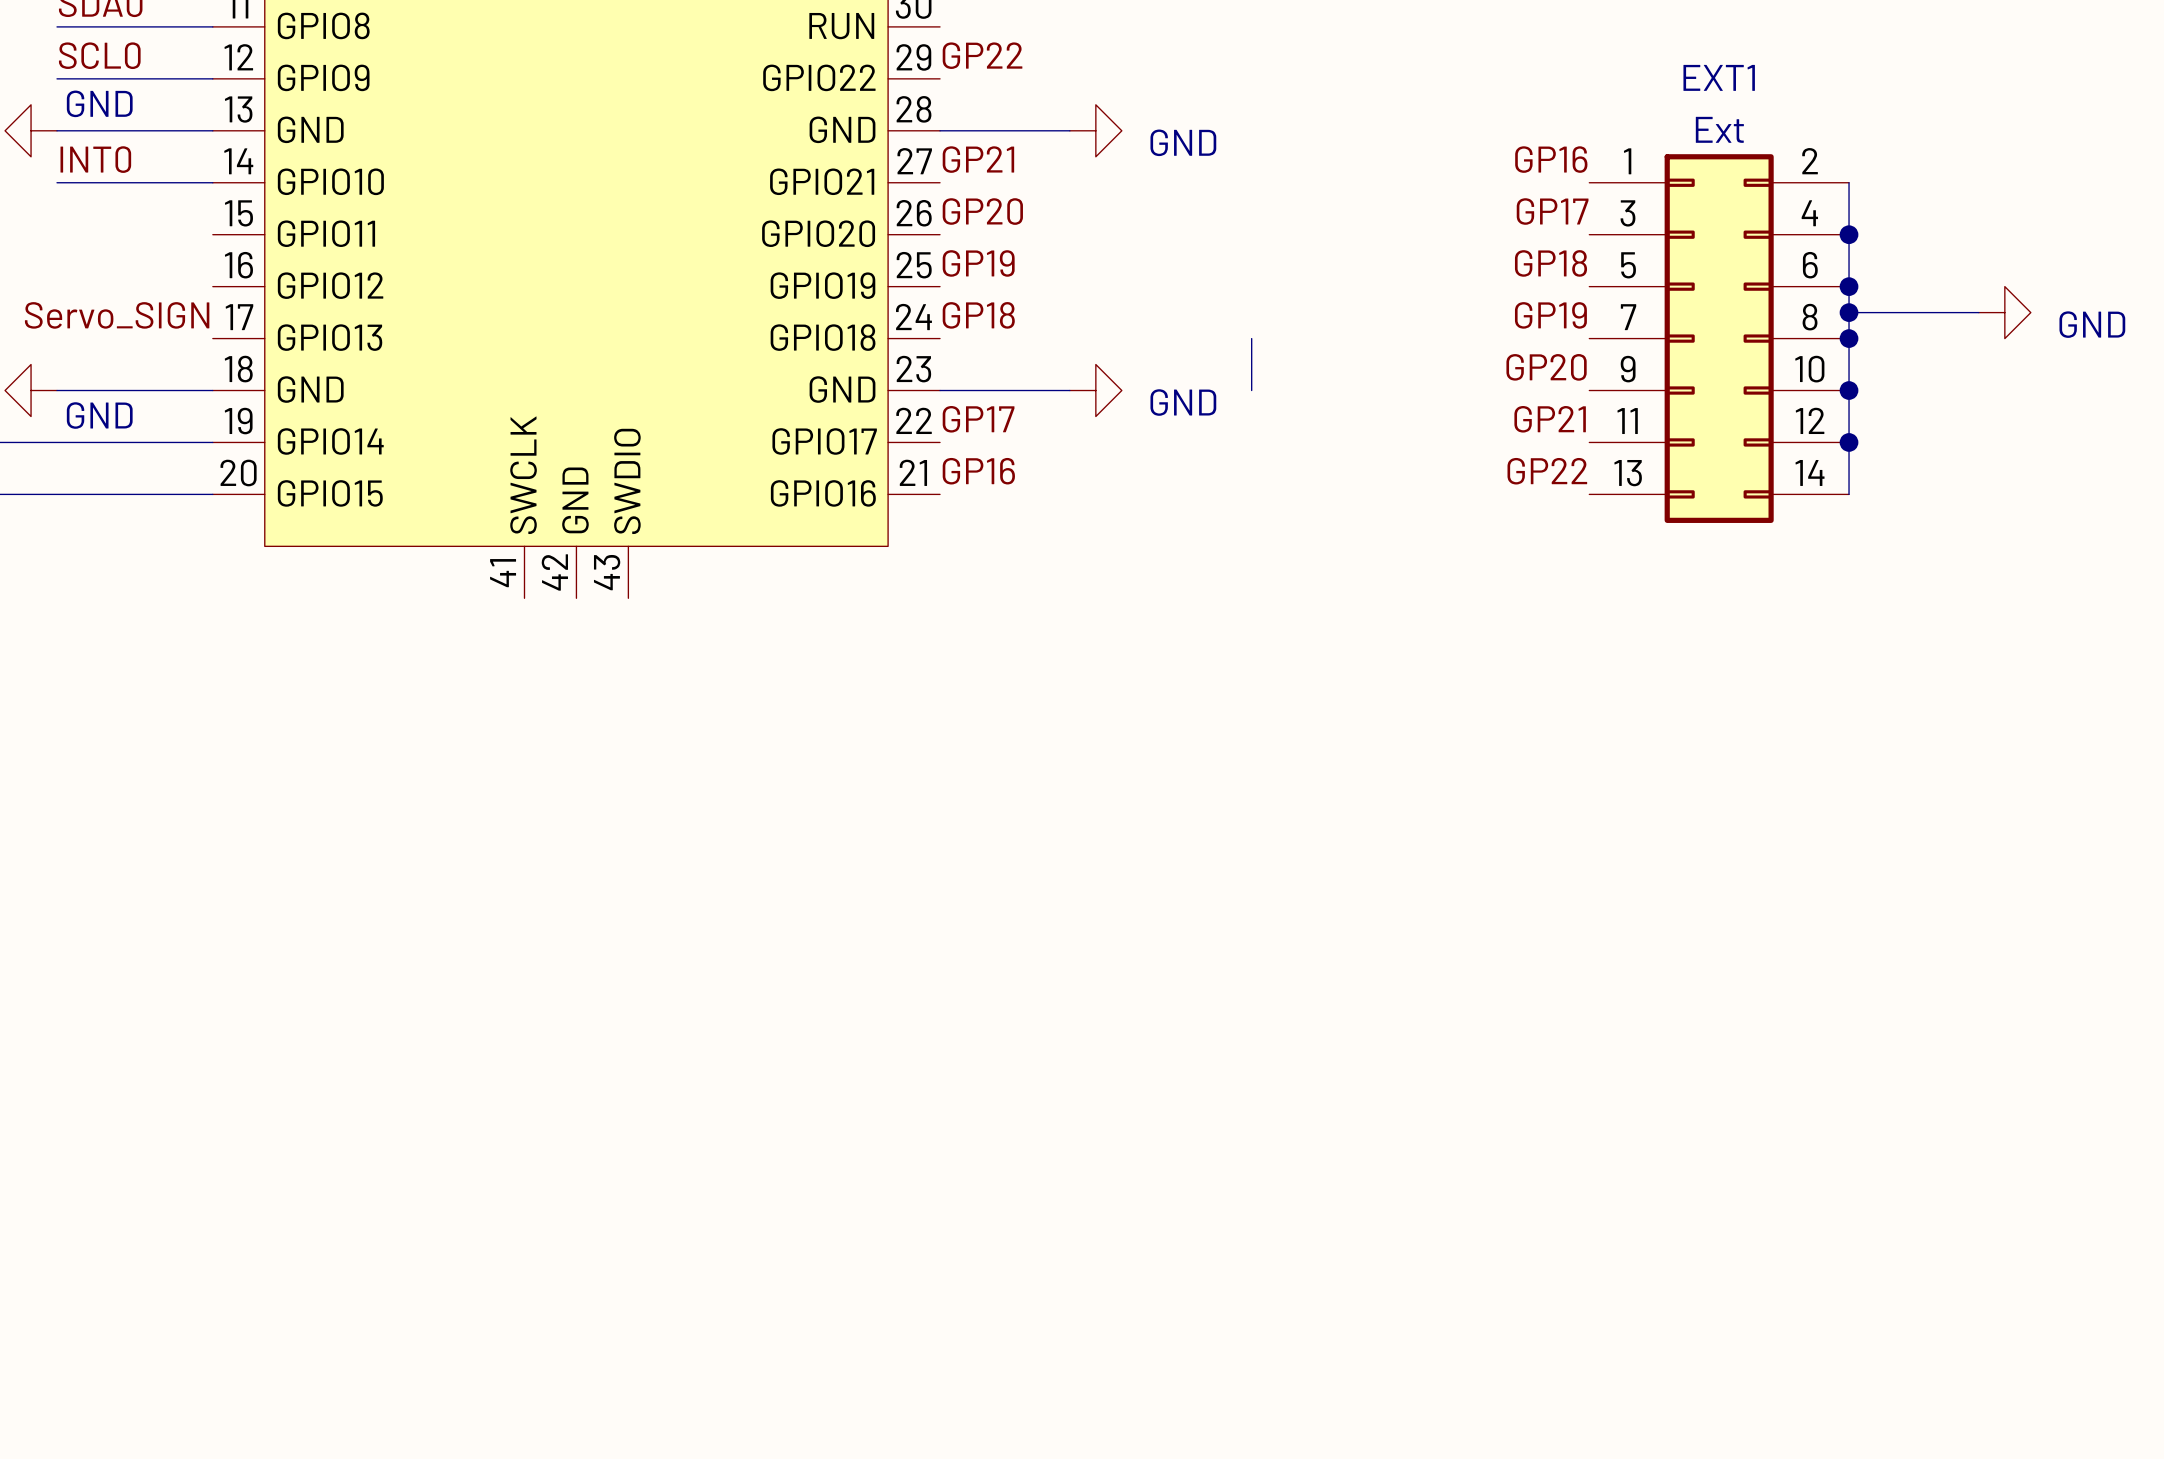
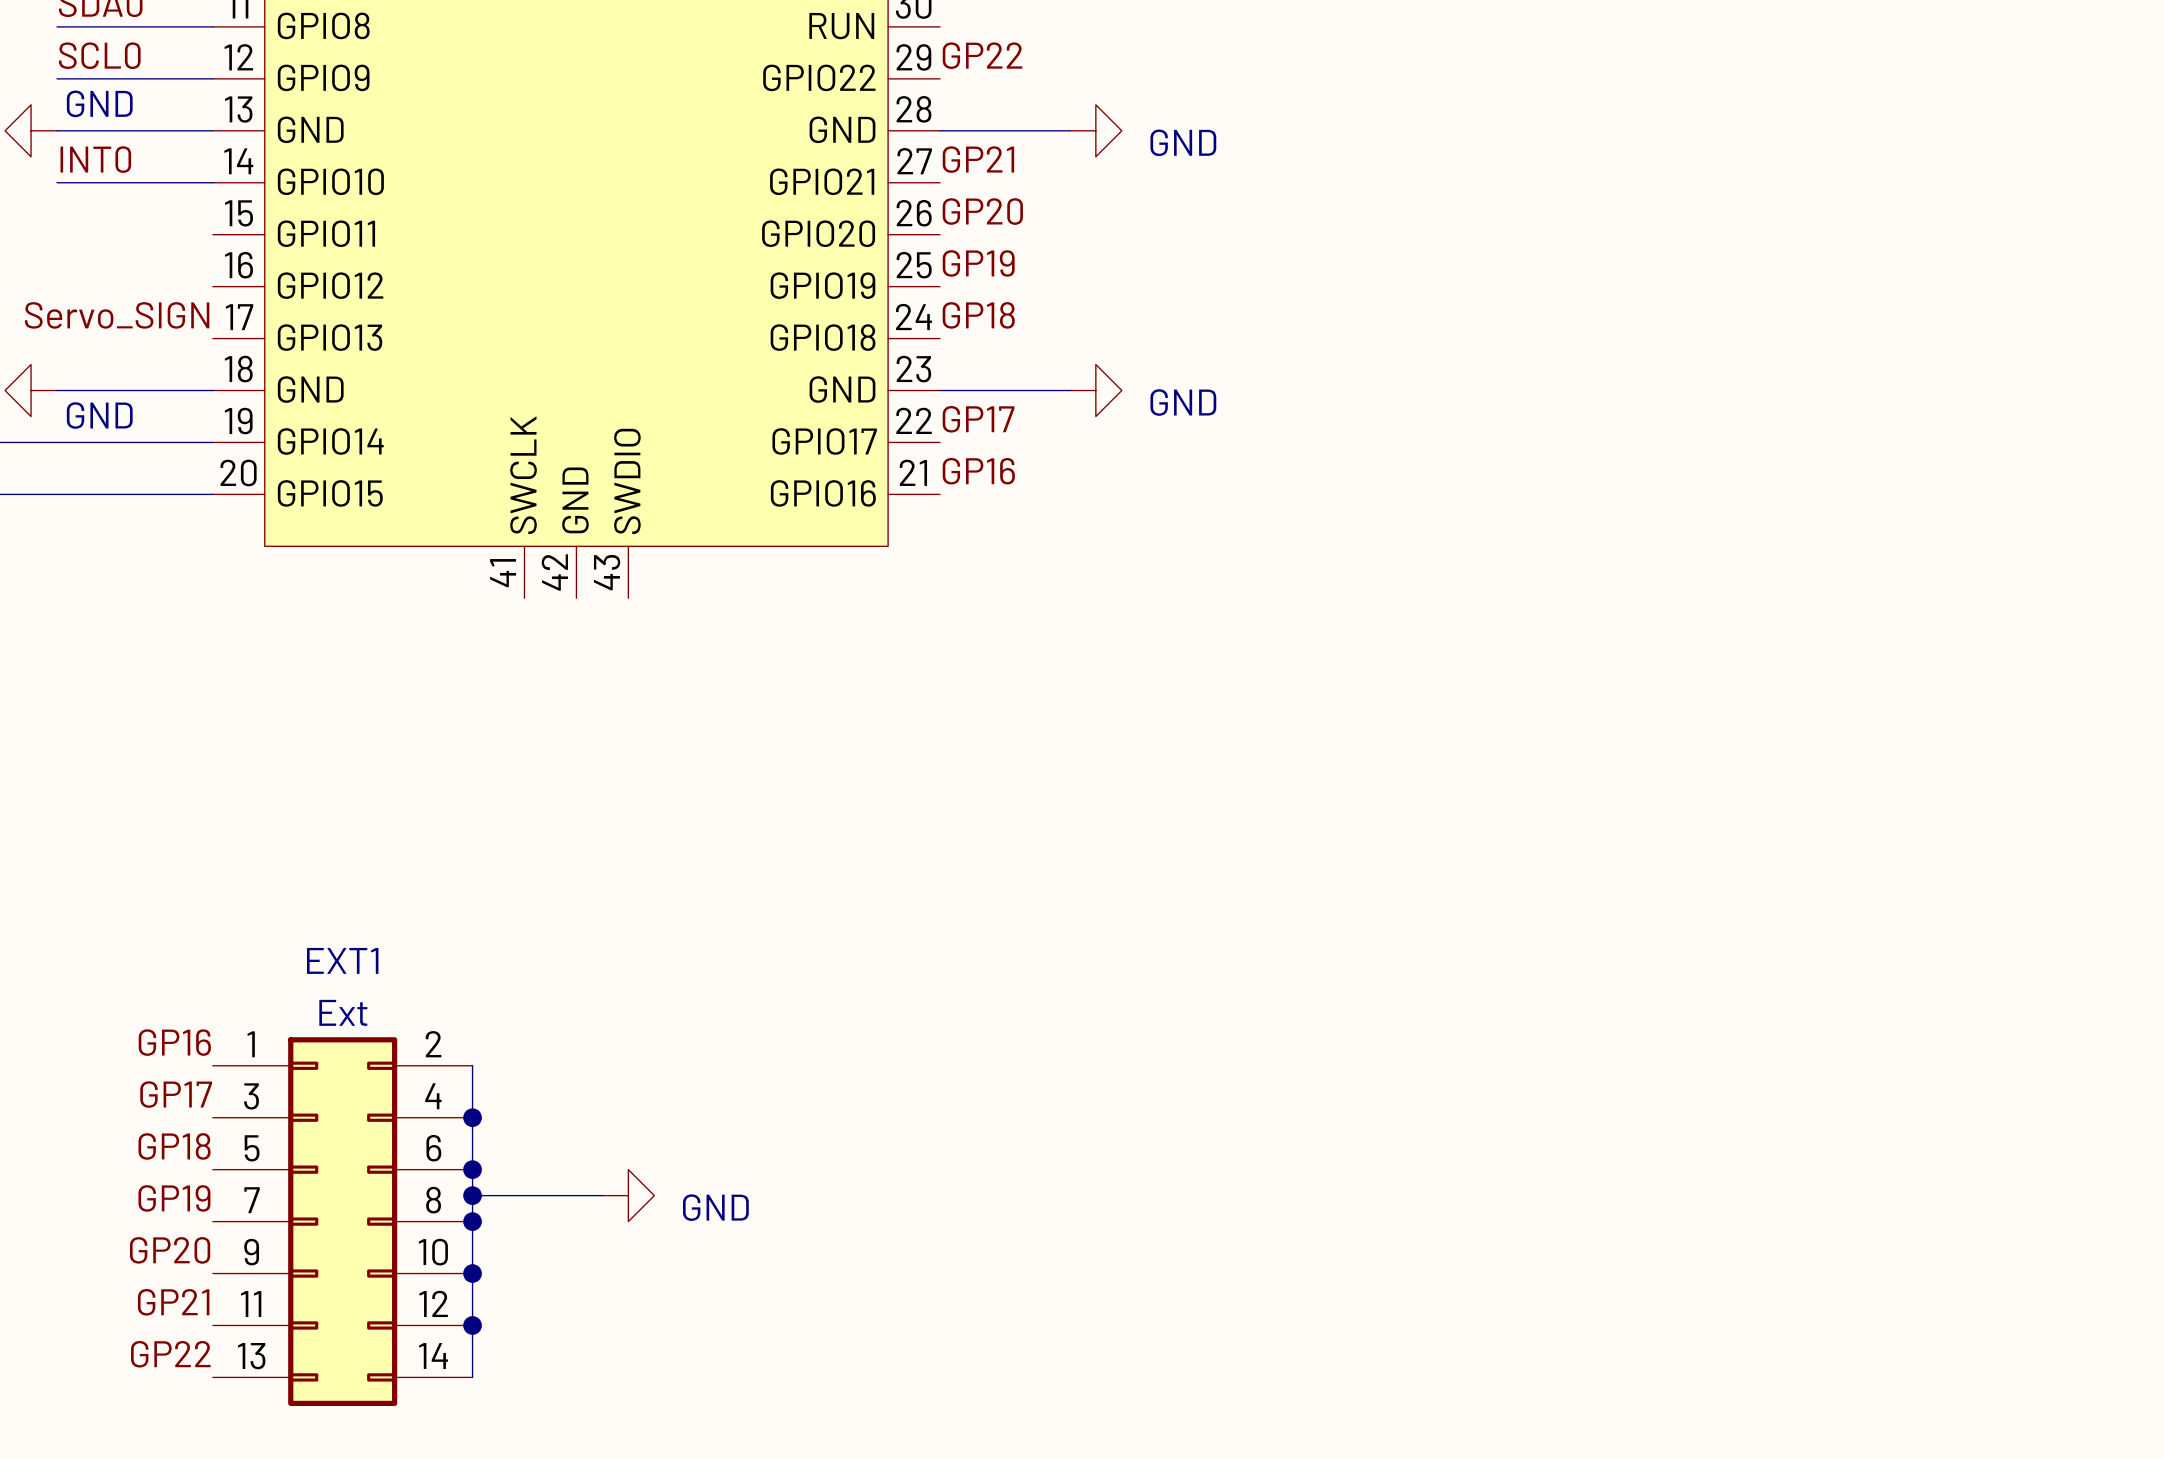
label: GP16 (1551, 159) -> none
wire: (1849, 182) (1849, 494) -> none
label: GP17 (1552, 211) -> none
junction: (1849, 234) -> none
label: GP18 (1551, 263) -> none
junction: (1849, 286) -> none
wire: (1849, 312) (1978, 312) -> none
junction: (1849, 312) -> none
power symbol: GND (2004, 312) -> none
label: GP19 (1550, 315) -> none
wire: (1251, 338) (1251, 390) -> none
EXT1 position: (1719, 338) -> (342, 1221)
junction: (1849, 338) -> none
label: GP20 (1546, 367) -> none
junction: (1849, 390) -> none
label: GP21 (1550, 419) -> none
junction: (1849, 442) -> none
label: GP22 (1547, 471) -> none
label: none -> GP16 (174, 1042)
wire: none -> (472, 1065) (472, 1377)
label: none -> GP17 (176, 1094)
junction: none -> (472, 1117)
label: none -> GP18 (174, 1146)
junction: none -> (472, 1169)
wire: none -> (472, 1195) (602, 1195)
junction: none -> (472, 1195)
power symbol: none -> GND (628, 1195)
label: none -> GP19 (174, 1198)
junction: none -> (472, 1221)
label: none -> GP20 (170, 1250)
junction: none -> (472, 1273)
label: none -> GP21 (173, 1302)
junction: none -> (472, 1325)
label: none -> GP22 (170, 1354)

